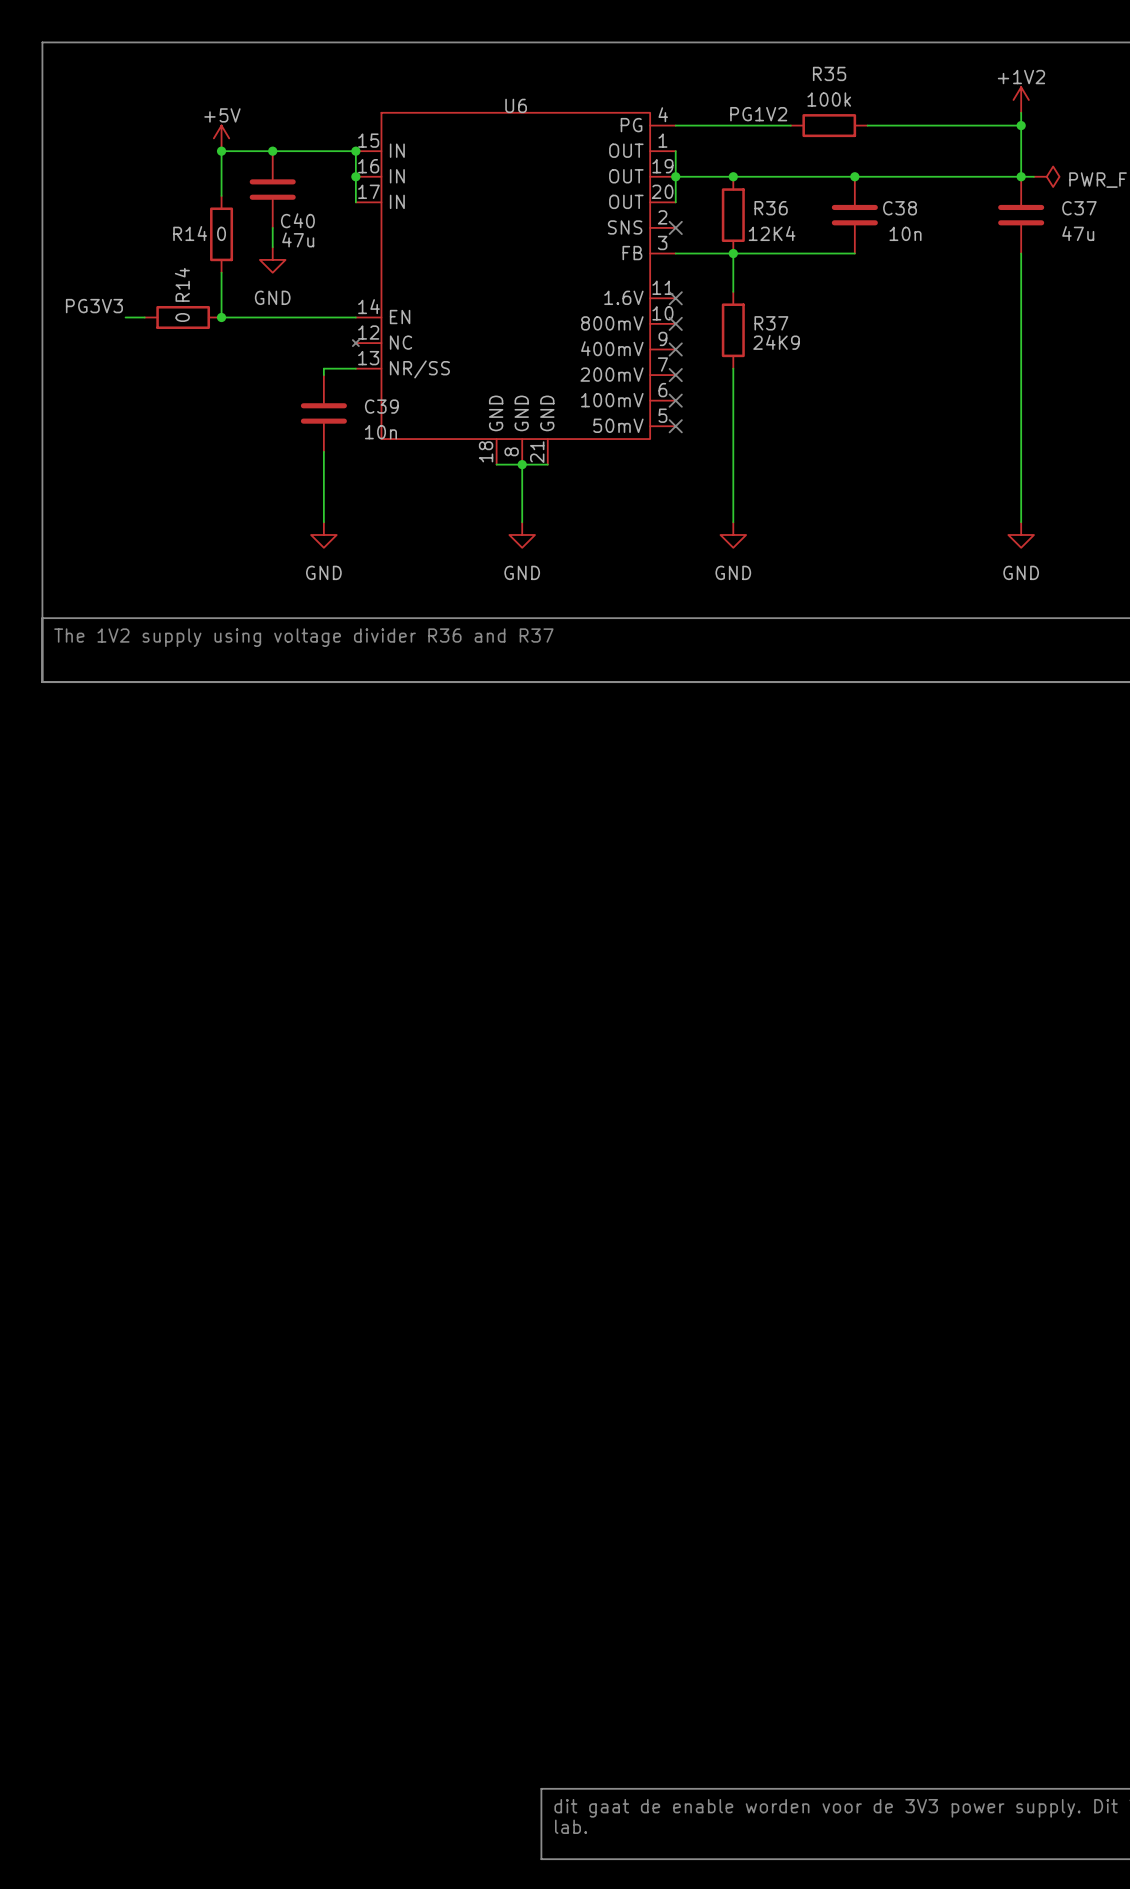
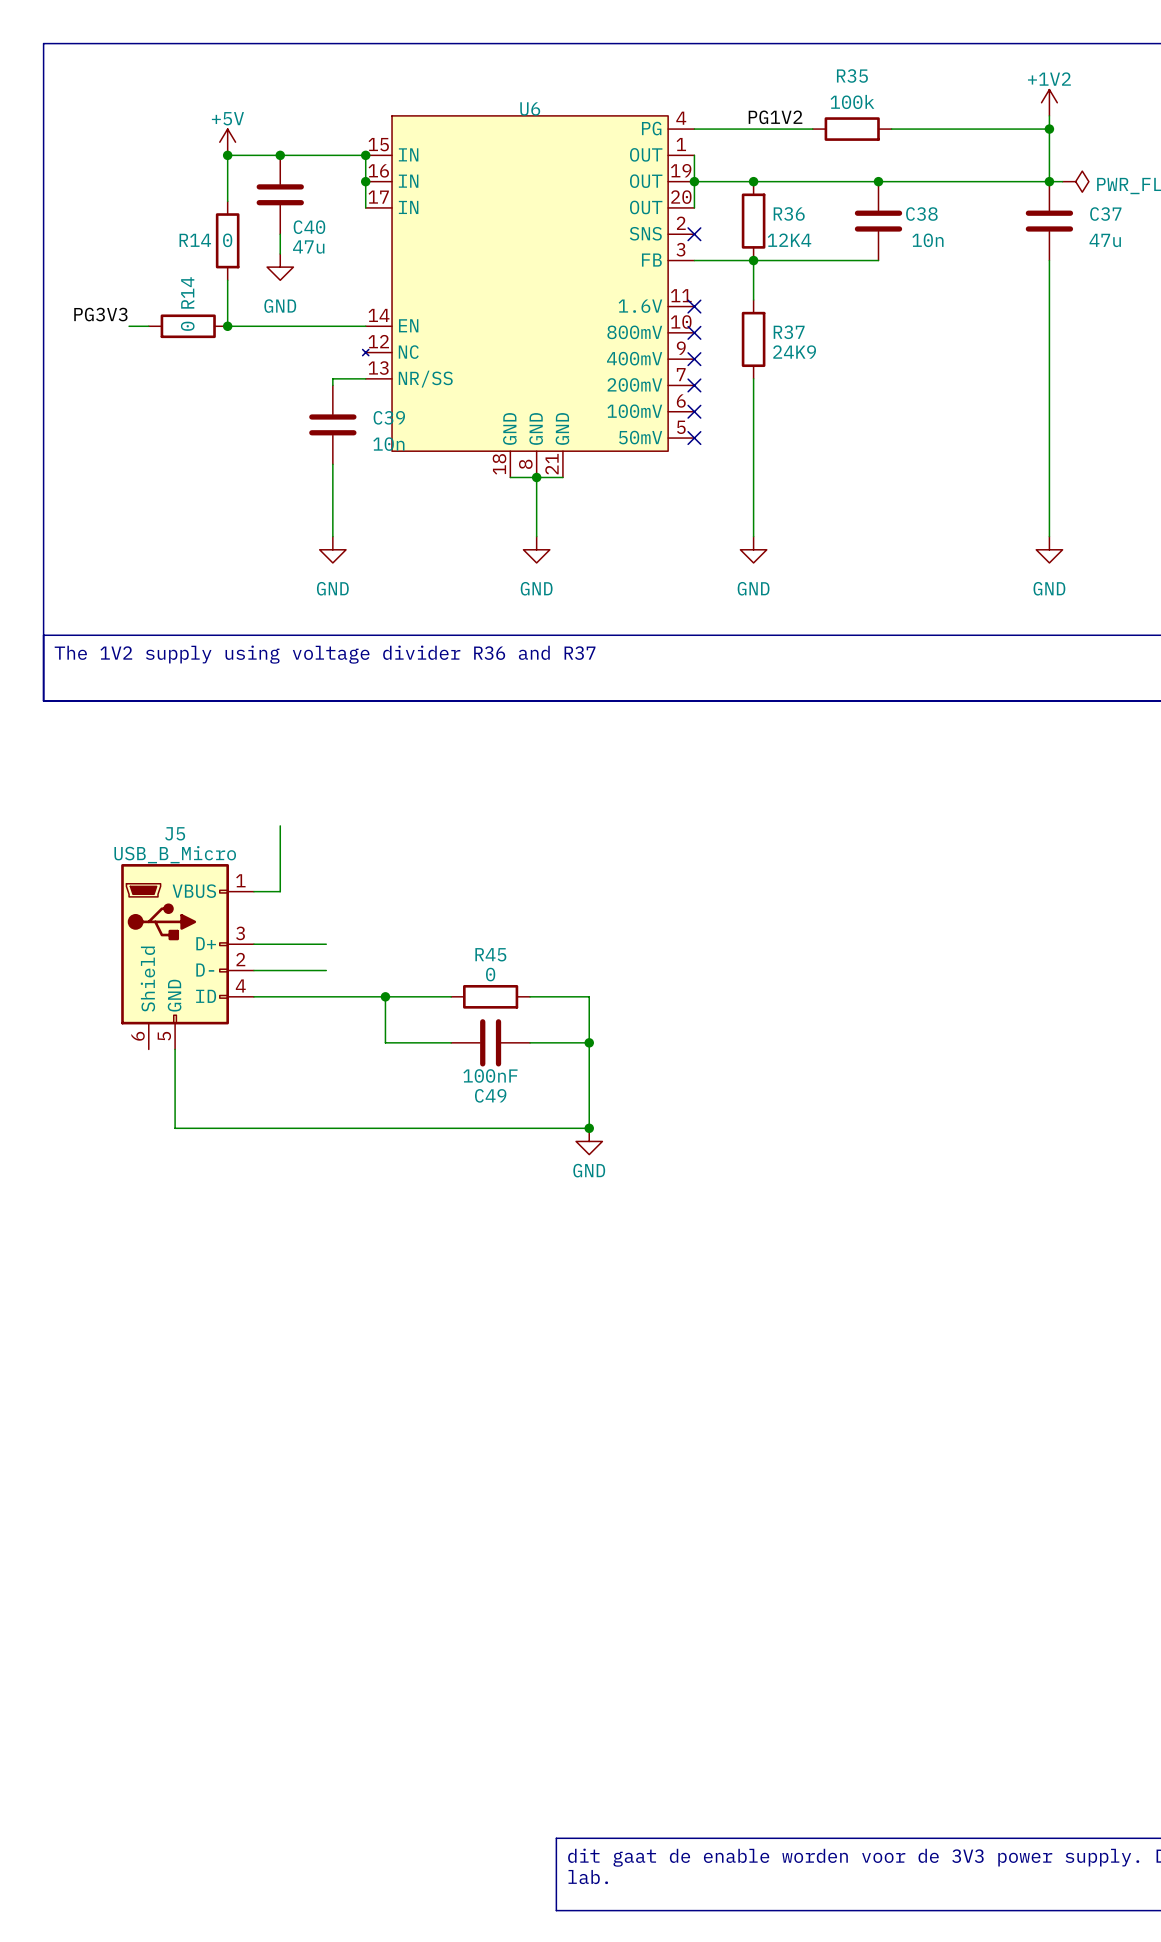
wire: none -> (280, 825) (280, 891) (253, 891)
wire: none -> (253, 944) (326, 944)
J5: none -> USB_B_Micro (187, 956)
wire: none -> (253, 970) (326, 970)
wire: none -> (253, 996) (451, 996)
wire: none -> (385, 996) (385, 1042) (451, 1042)
junction: none -> (385, 996)
R45: none -> 0 (490, 996)
wire: none -> (530, 996) (589, 996) (589, 1128) (175, 1128) (175, 1049)
C49: none -> 100nF (490, 1042)
wire: none -> (530, 1042) (589, 1042)
junction: none -> (589, 1042)
junction: none -> (589, 1128)
power symbol: none -> GND (589, 1141)

